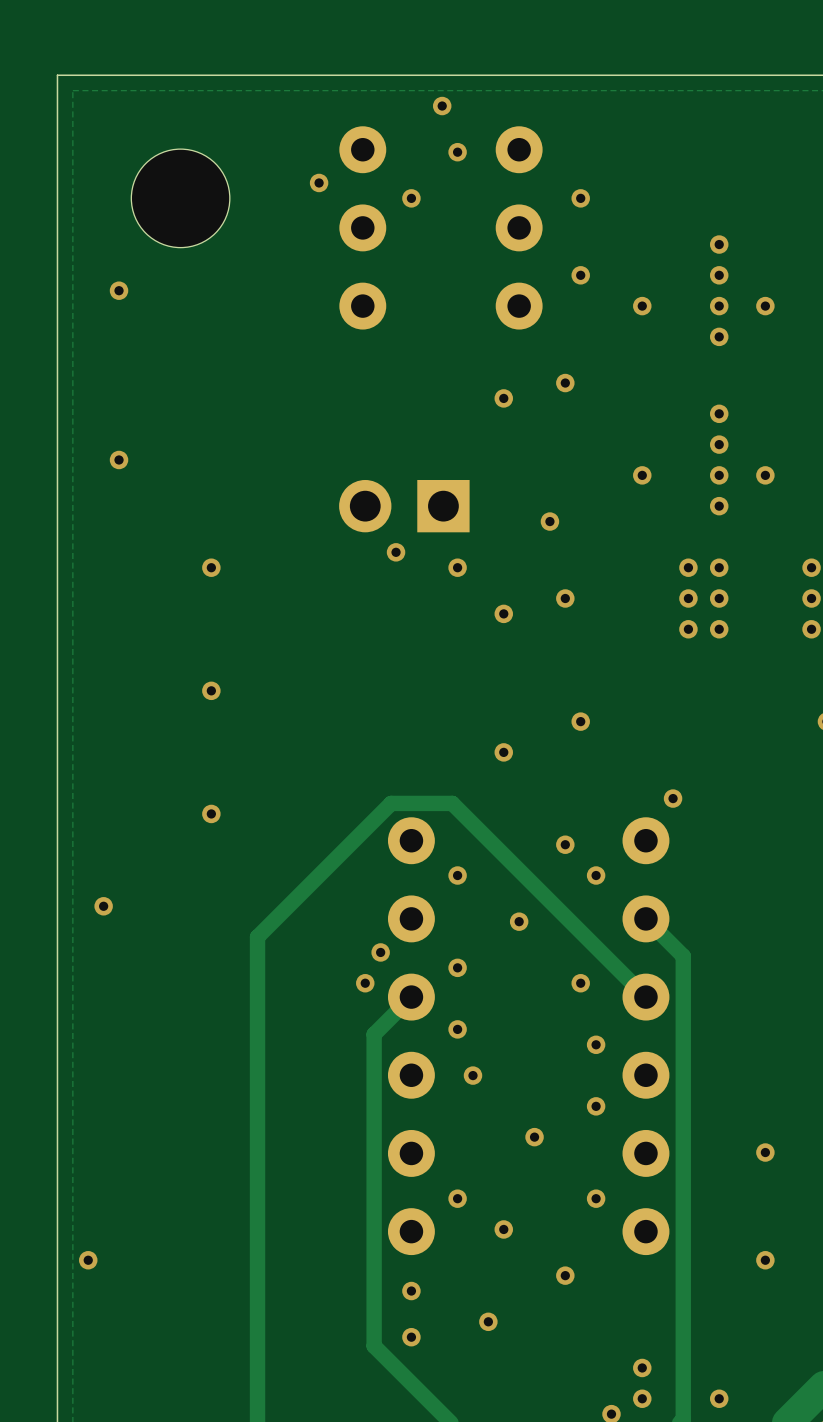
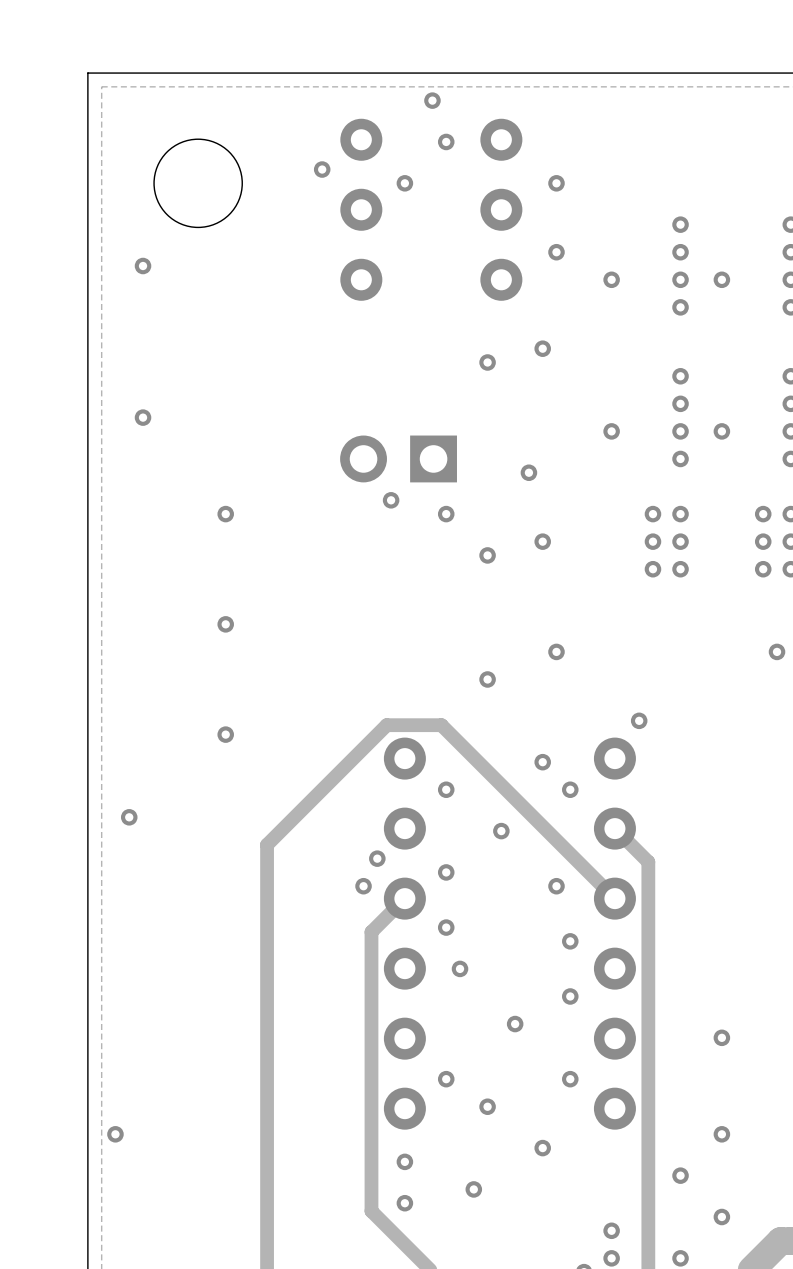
via: none -> (680, 1175)
via: none -> (721, 1217)

